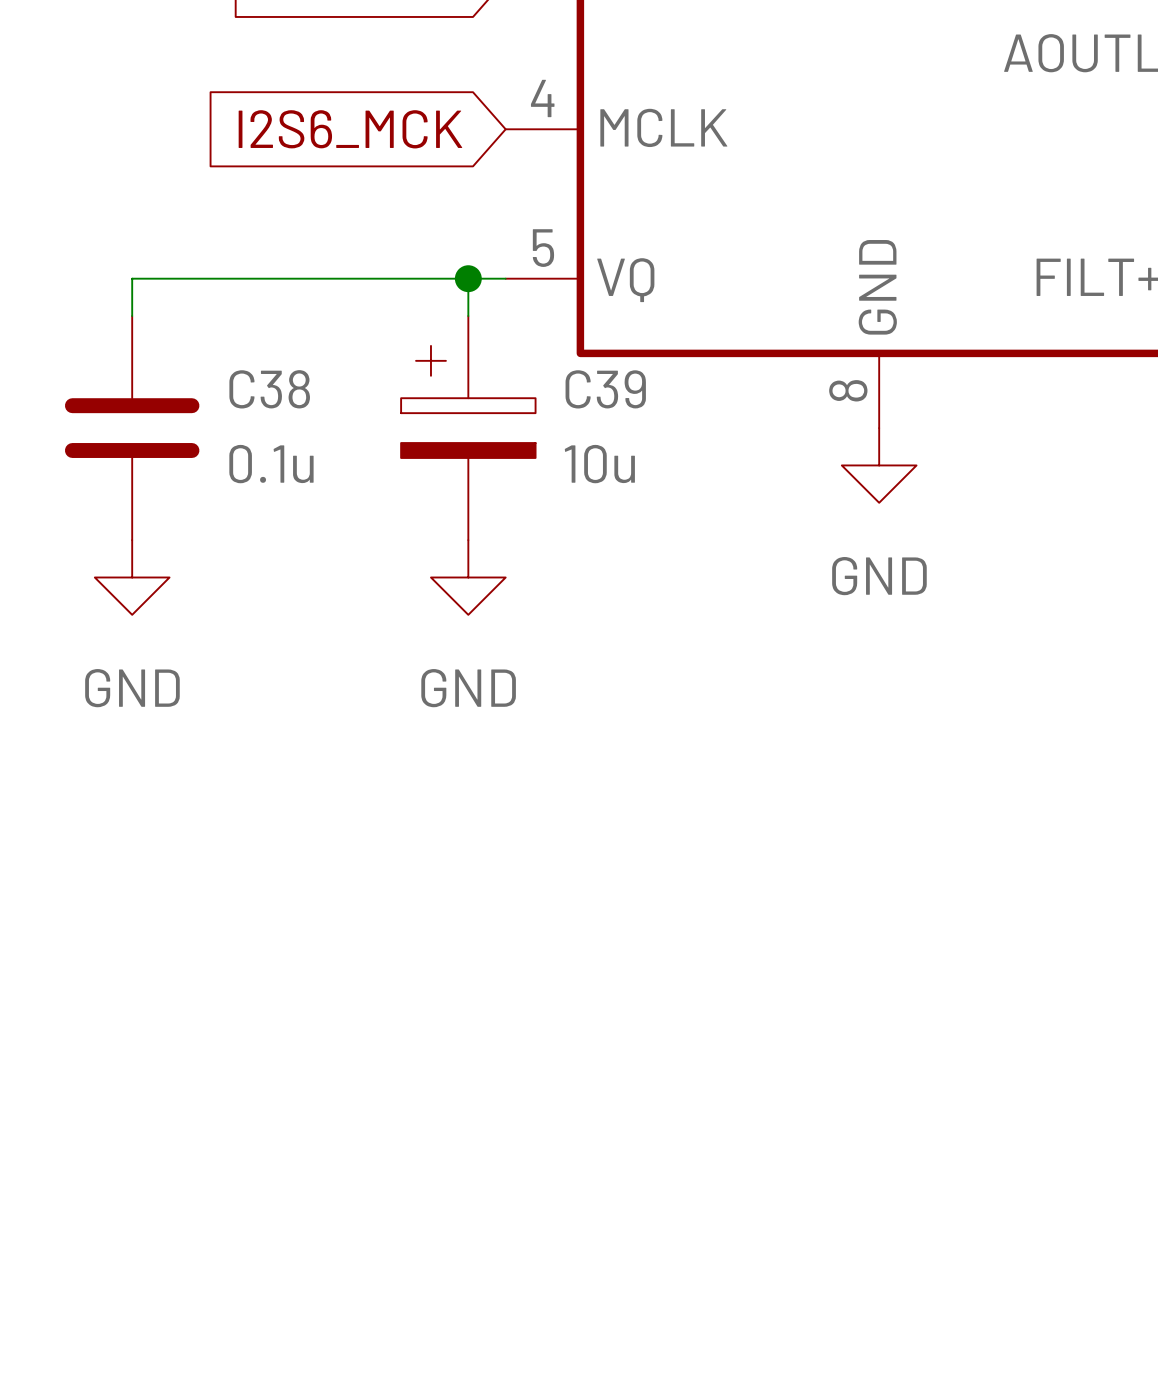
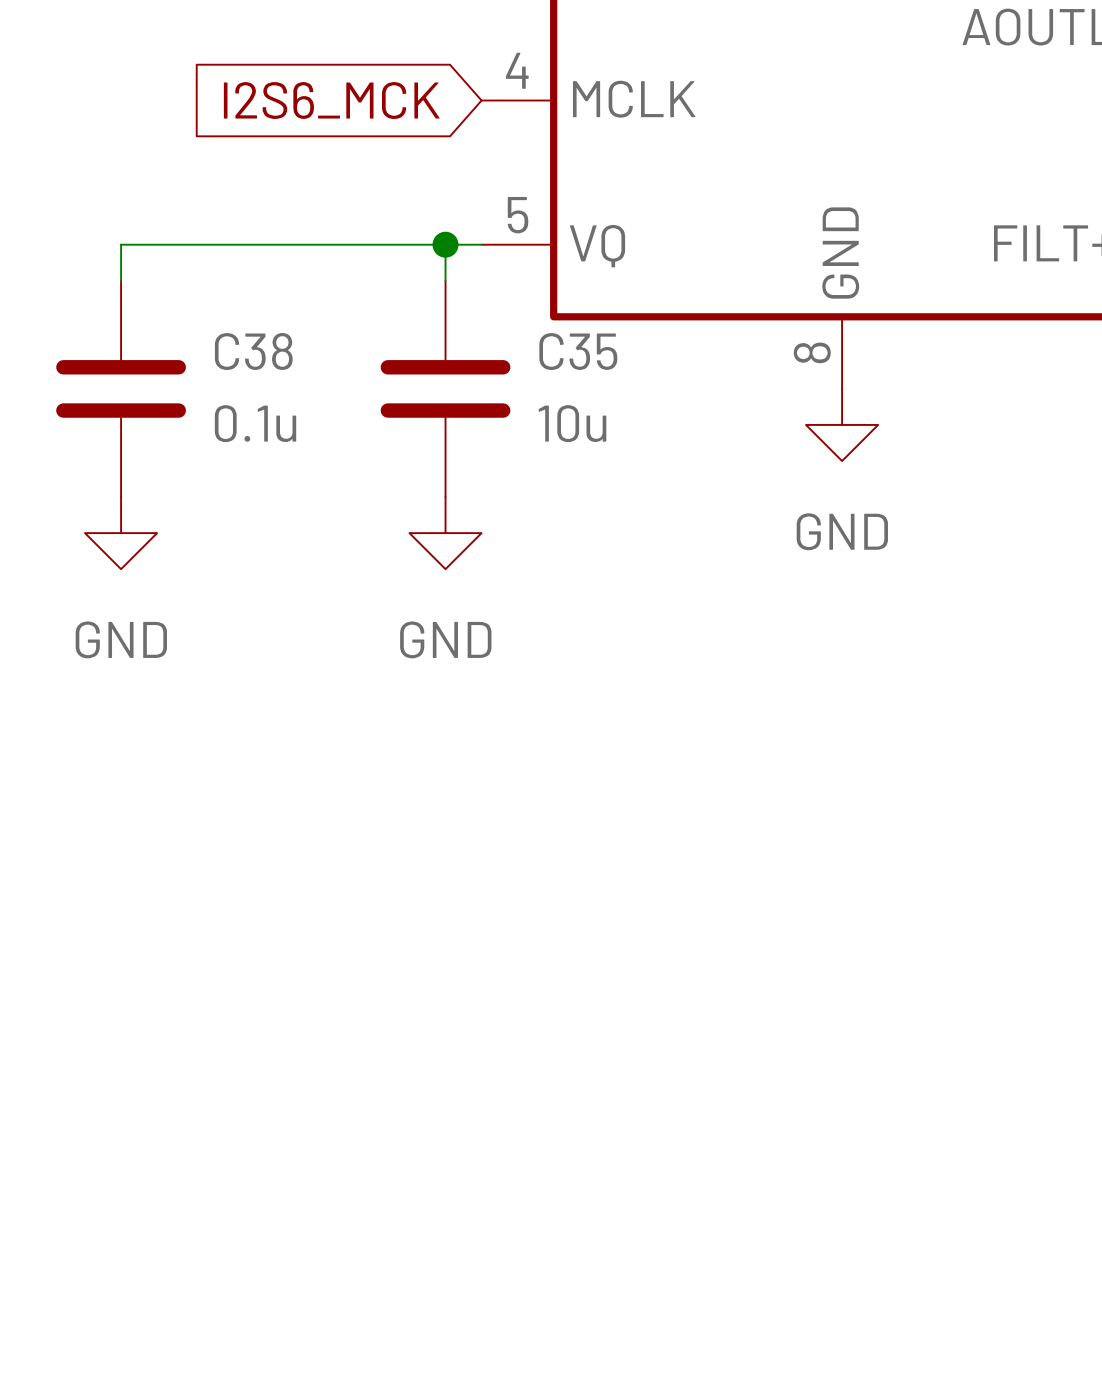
C39: 10u (468, 428) -> none
C35: none -> 10u (445, 388)

